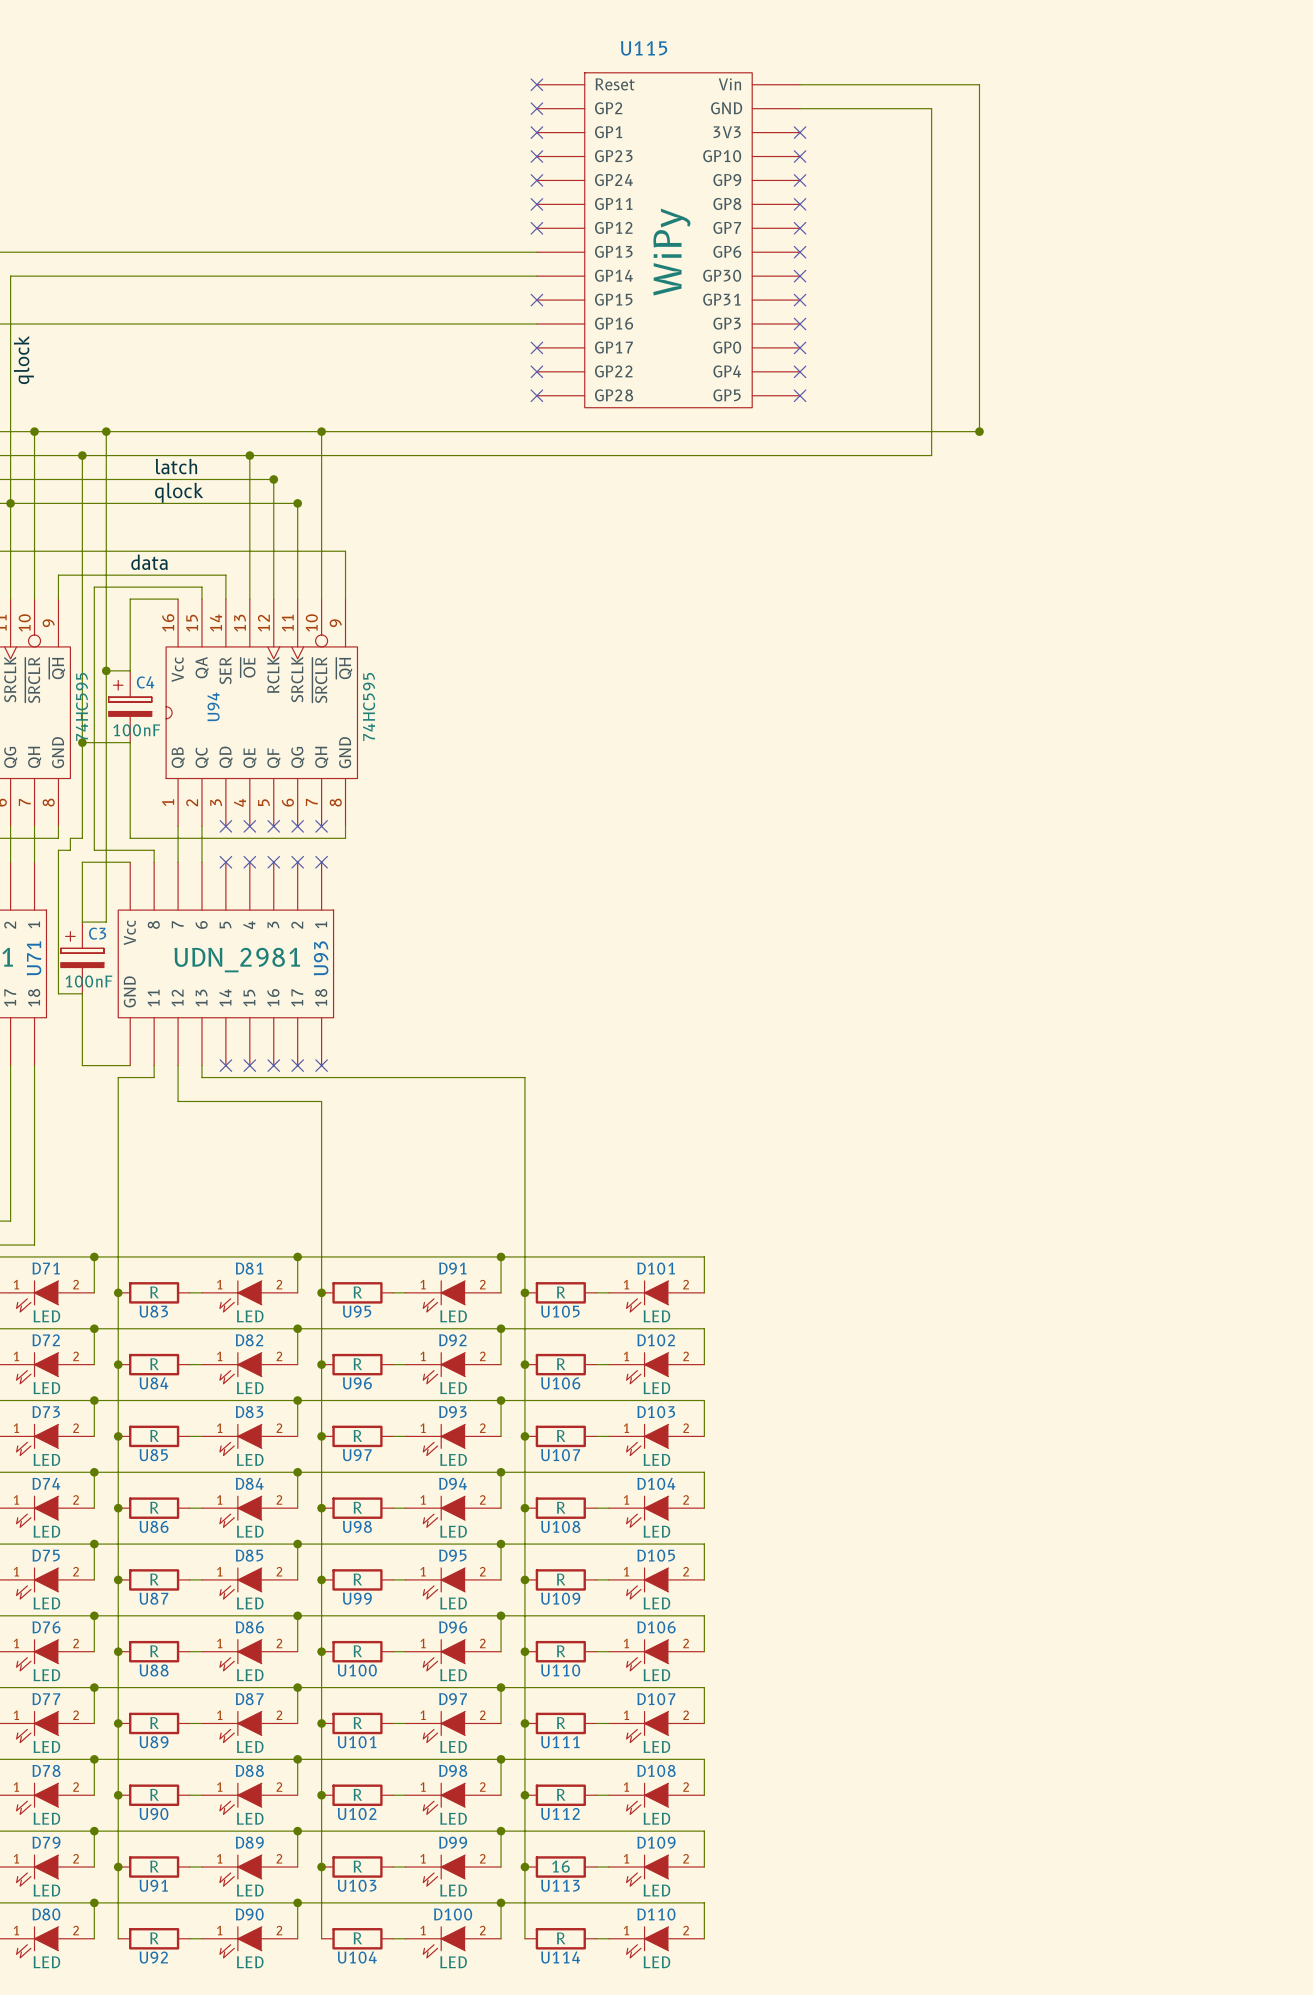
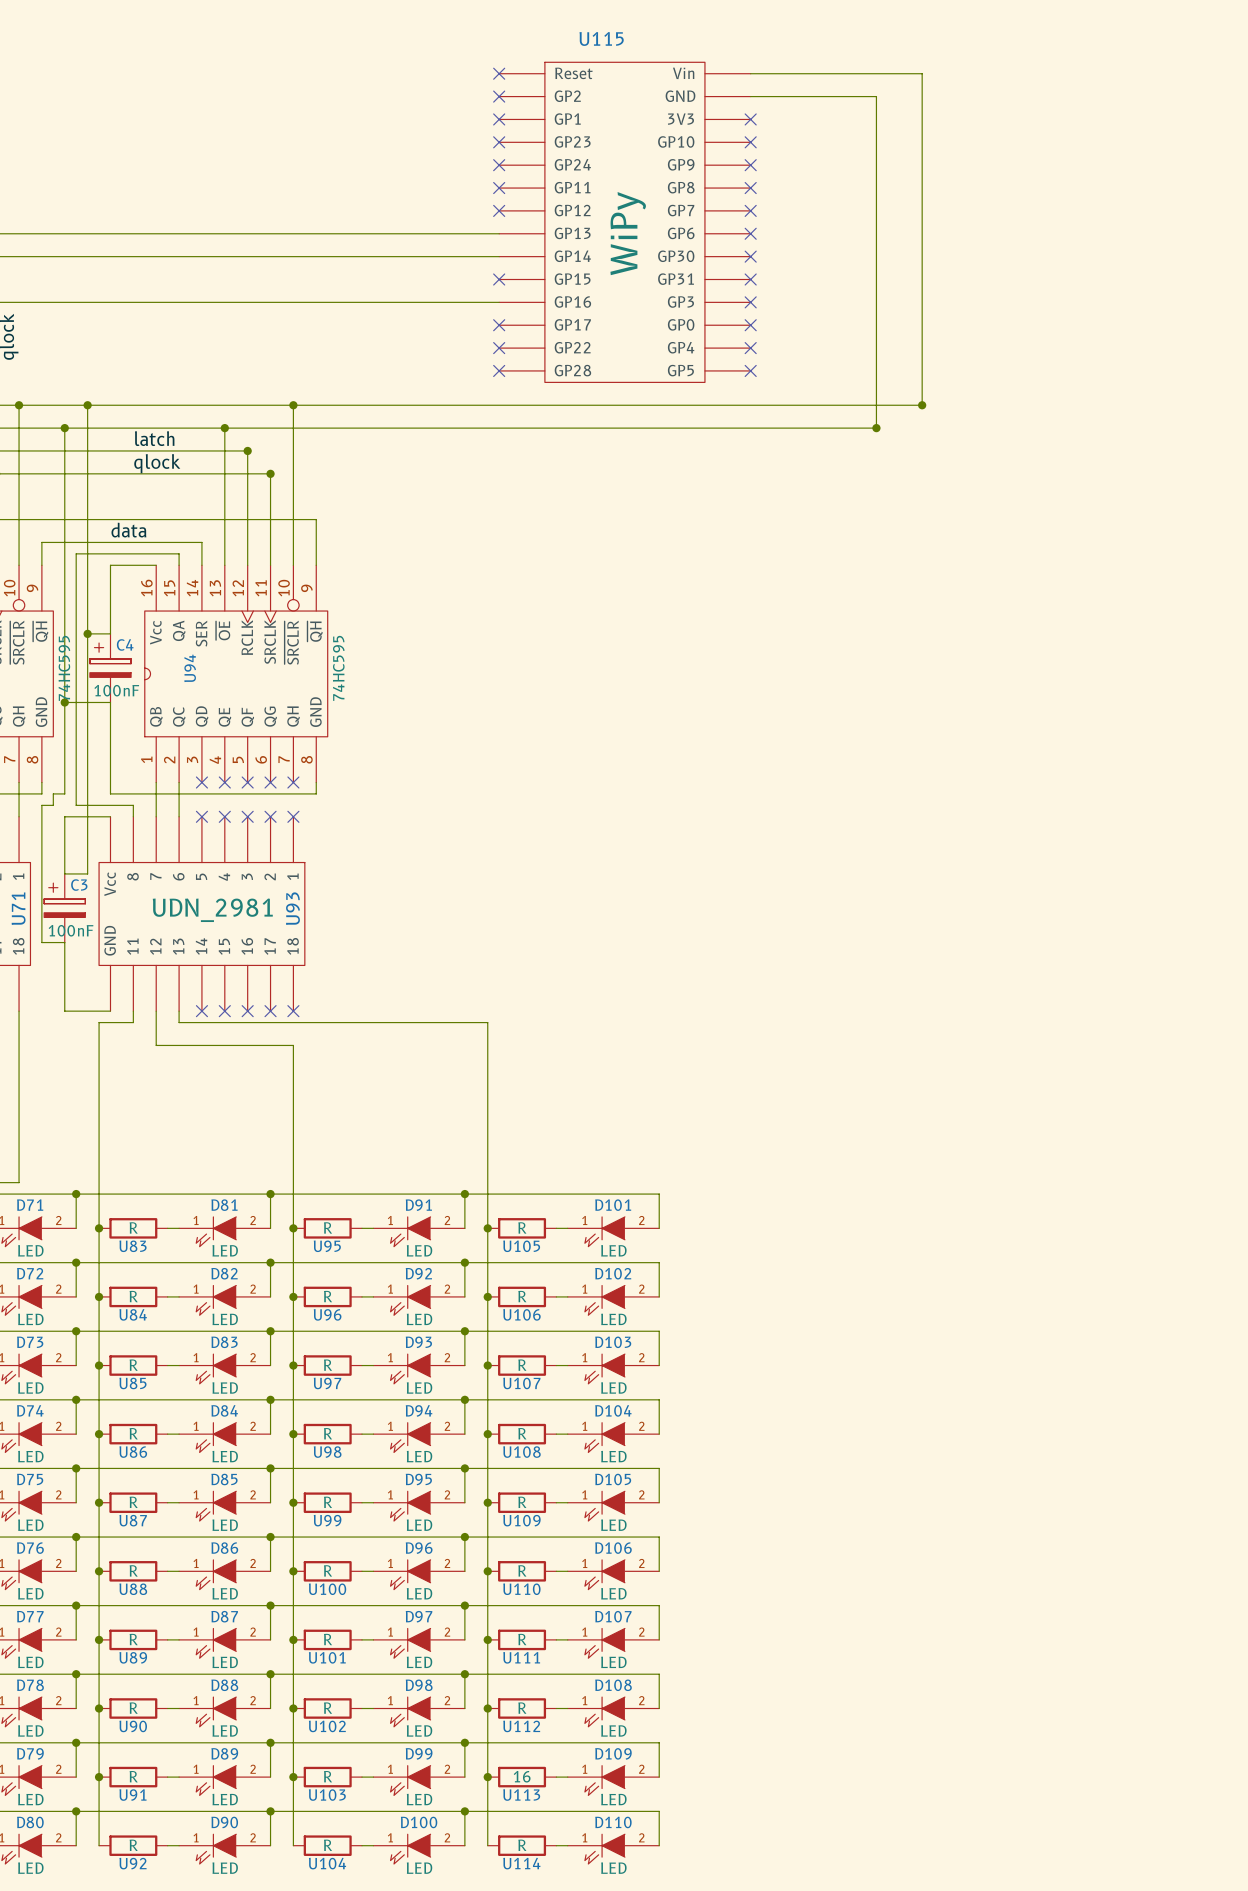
junction: none -> (876, 428)

